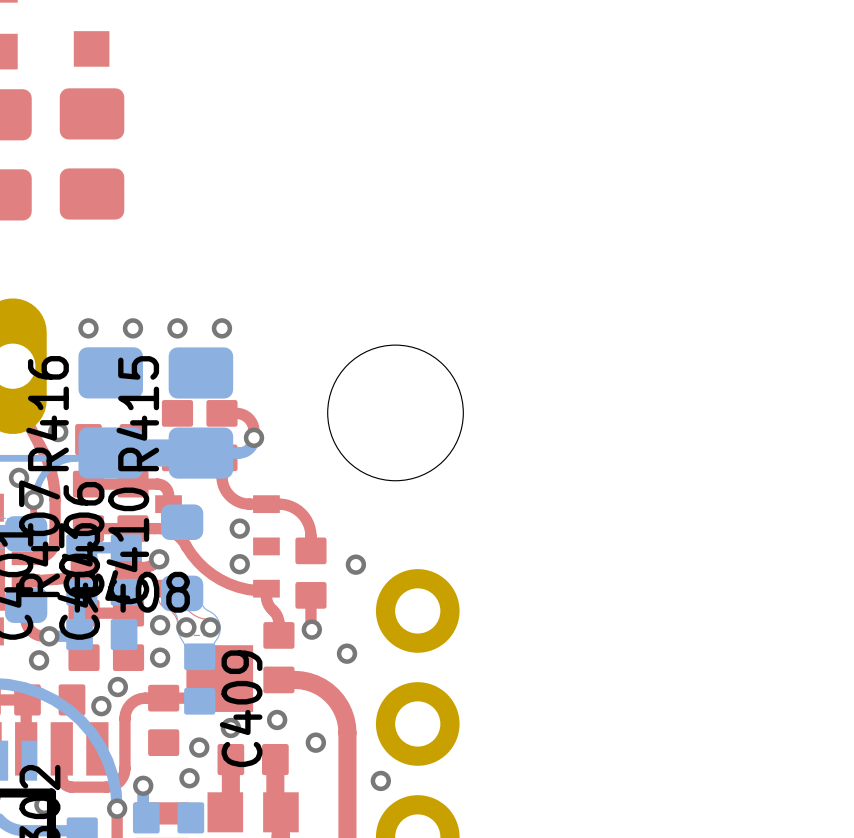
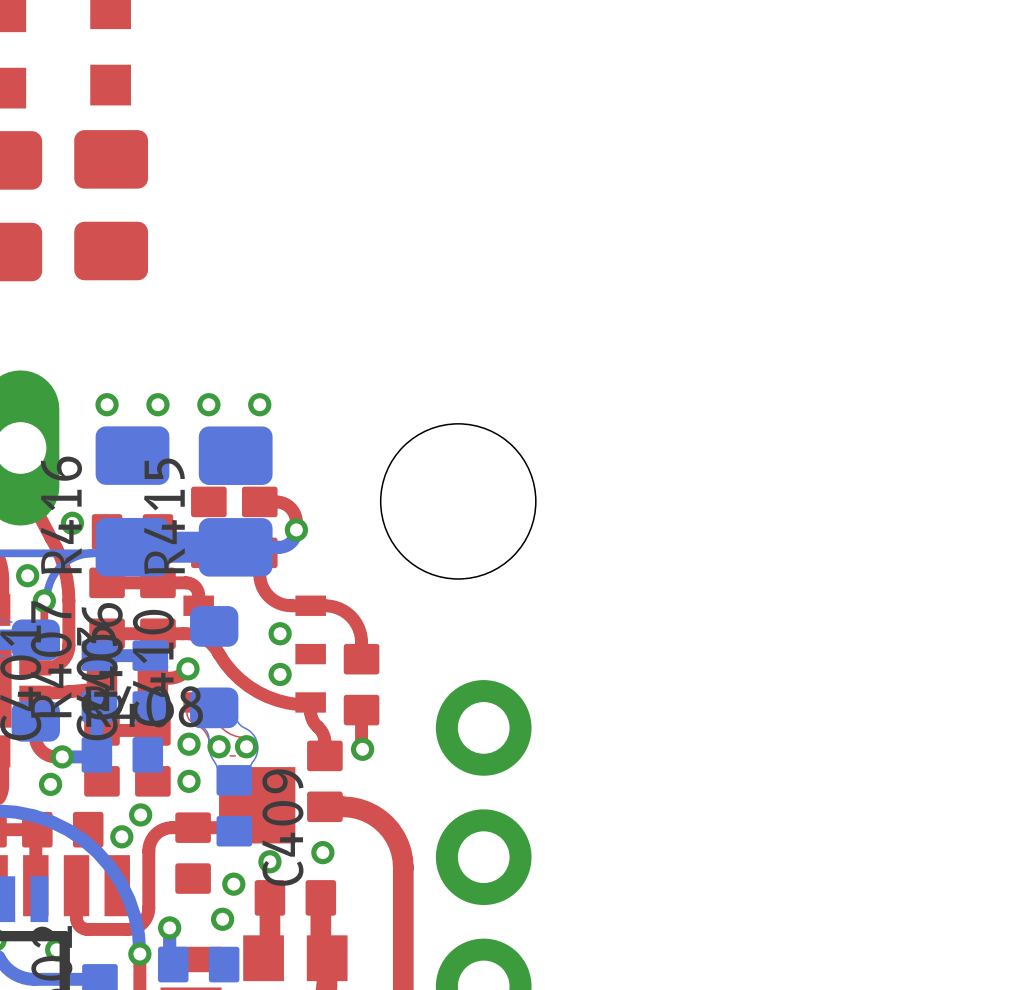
via: (355, 564) -> none
via: (347, 653) -> none
via: (315, 742) -> none
via: (380, 780) -> none

